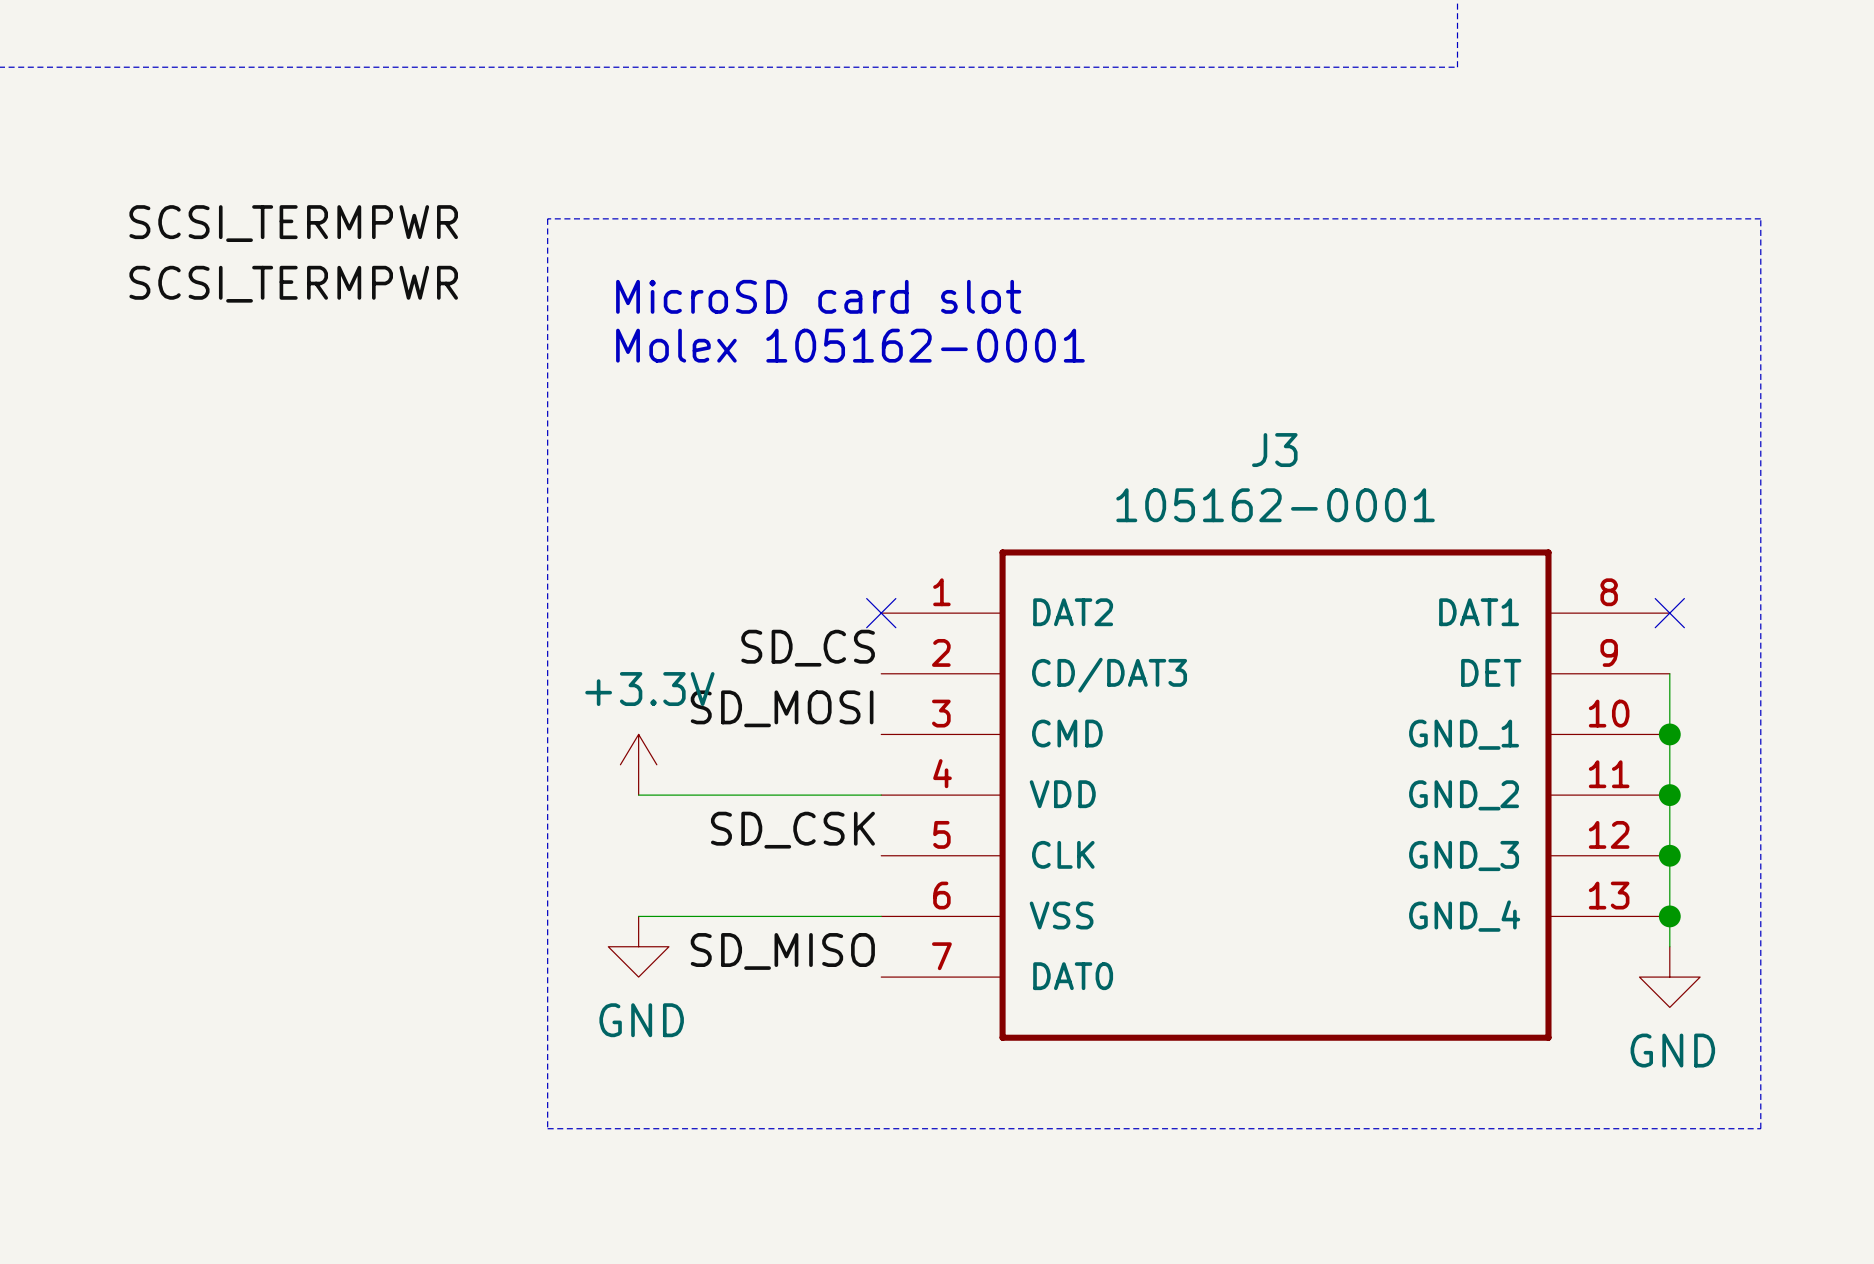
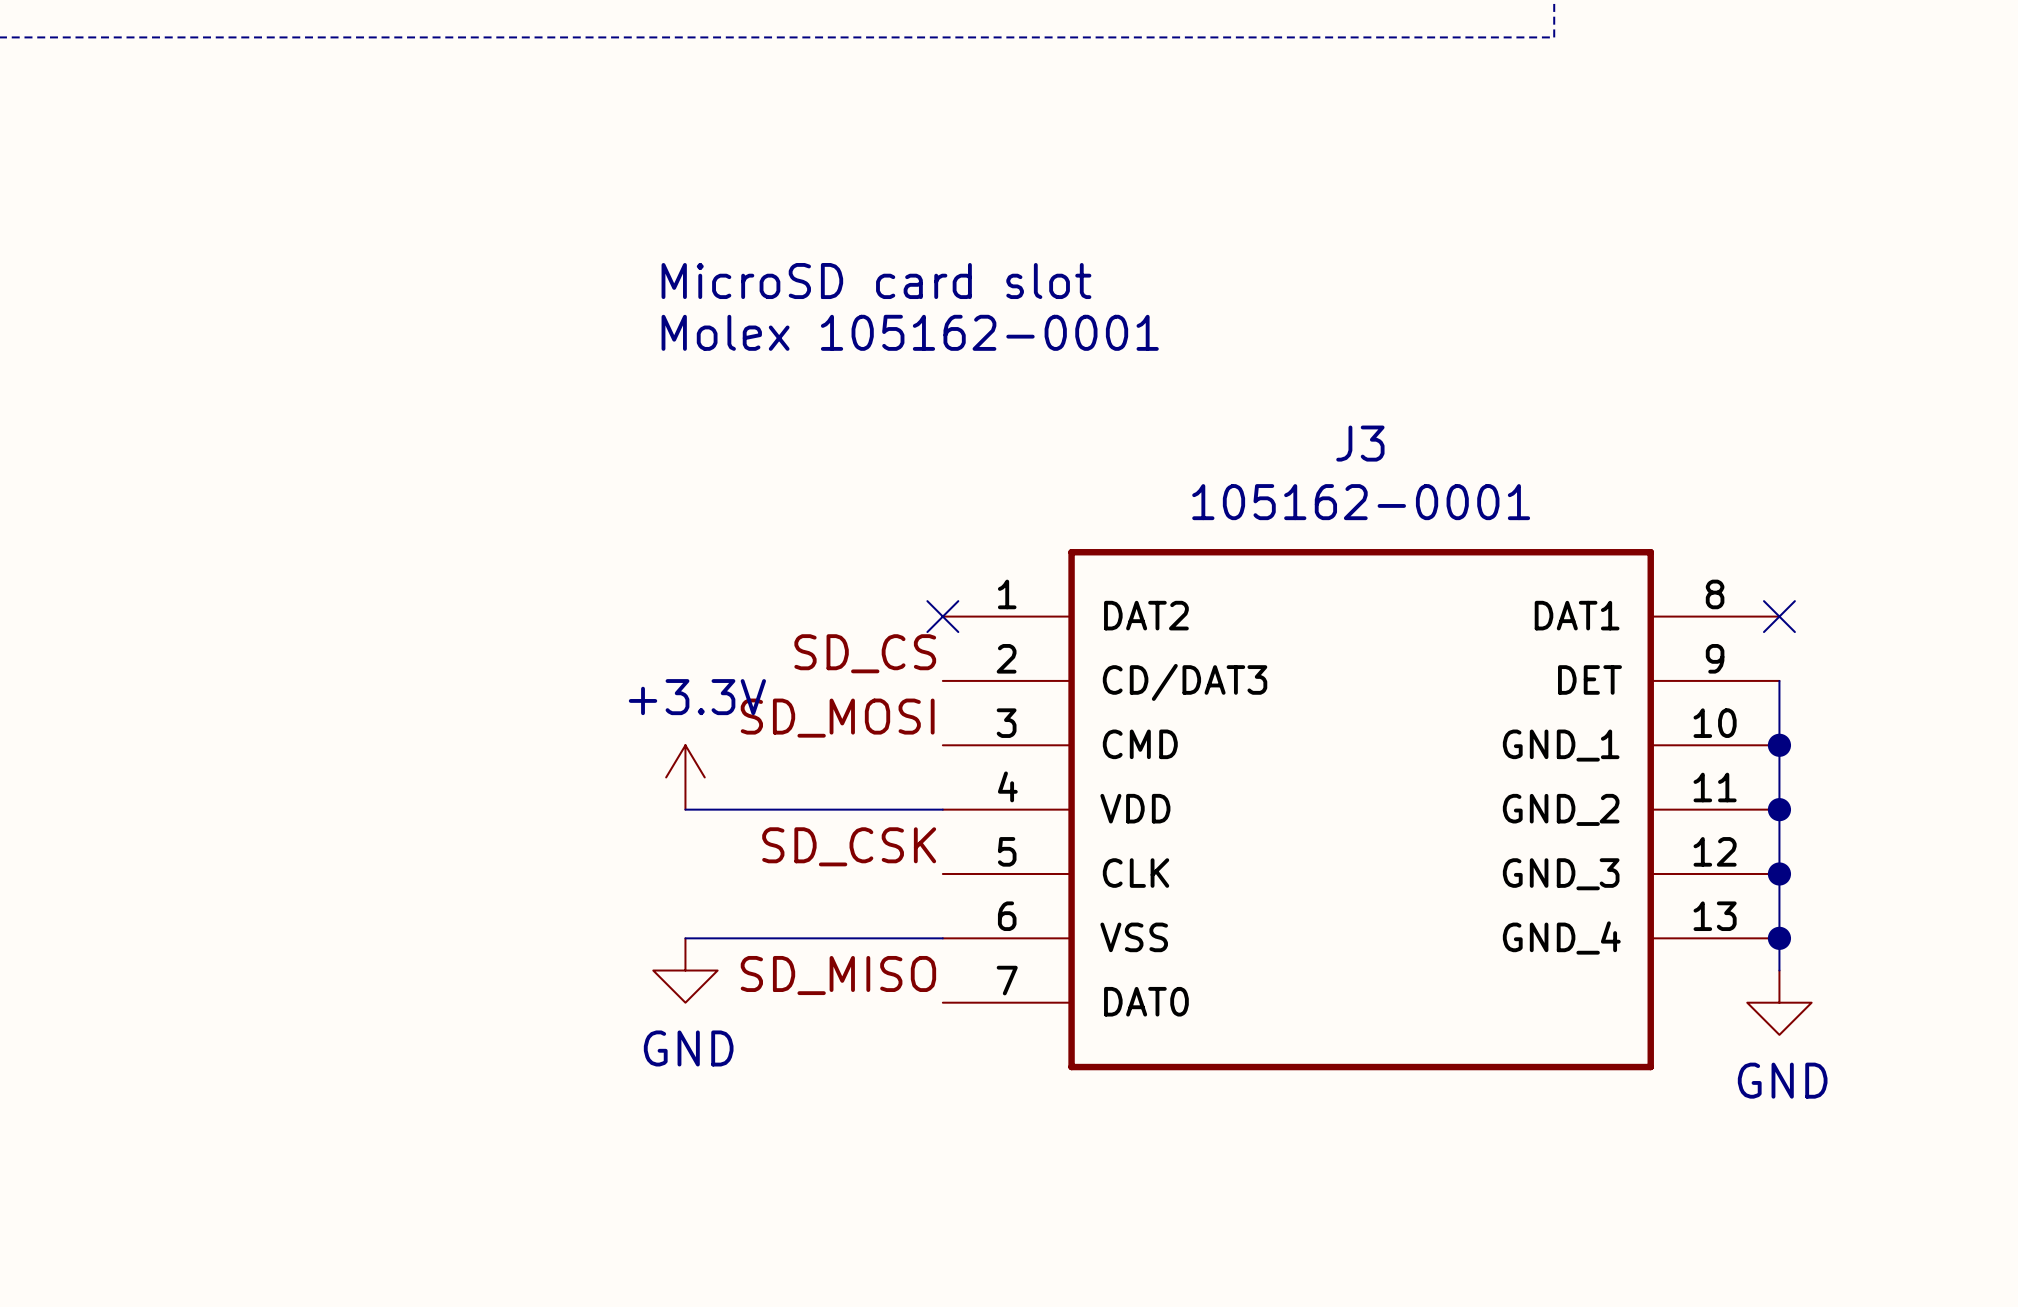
line: (547, 218) (547, 1128) (1760, 1128) (1760, 218) (547, 218) -> none
label: SCSI_TERMPWR (293, 223) -> none
label: SCSI_TERMPWR (293, 284) -> none

